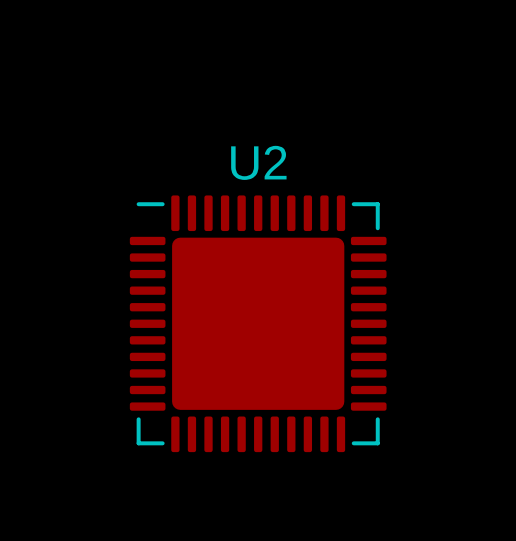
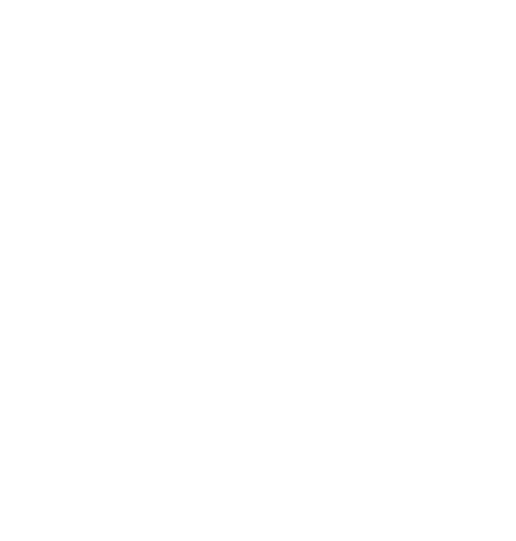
U2: (258, 323) -> none

